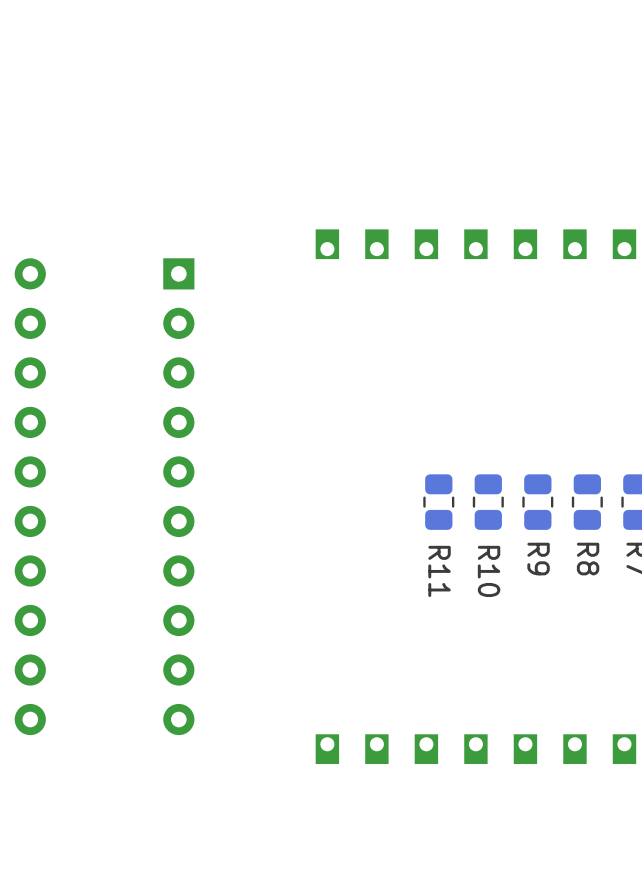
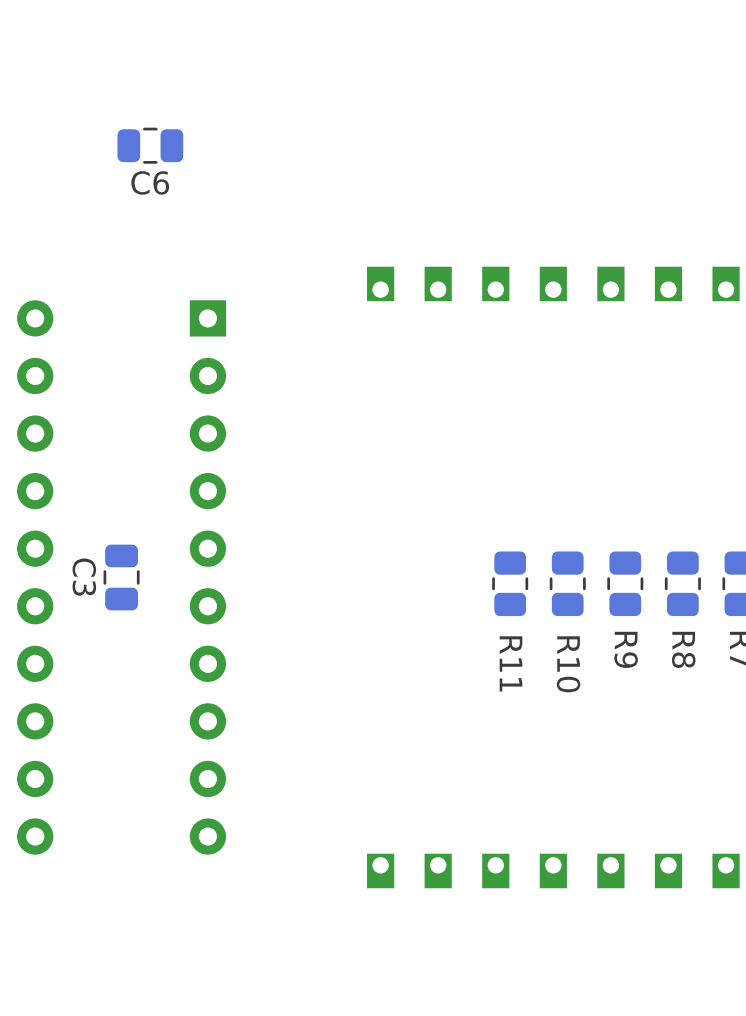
C6: none -> (150, 145)
C3: none -> (121, 577)

